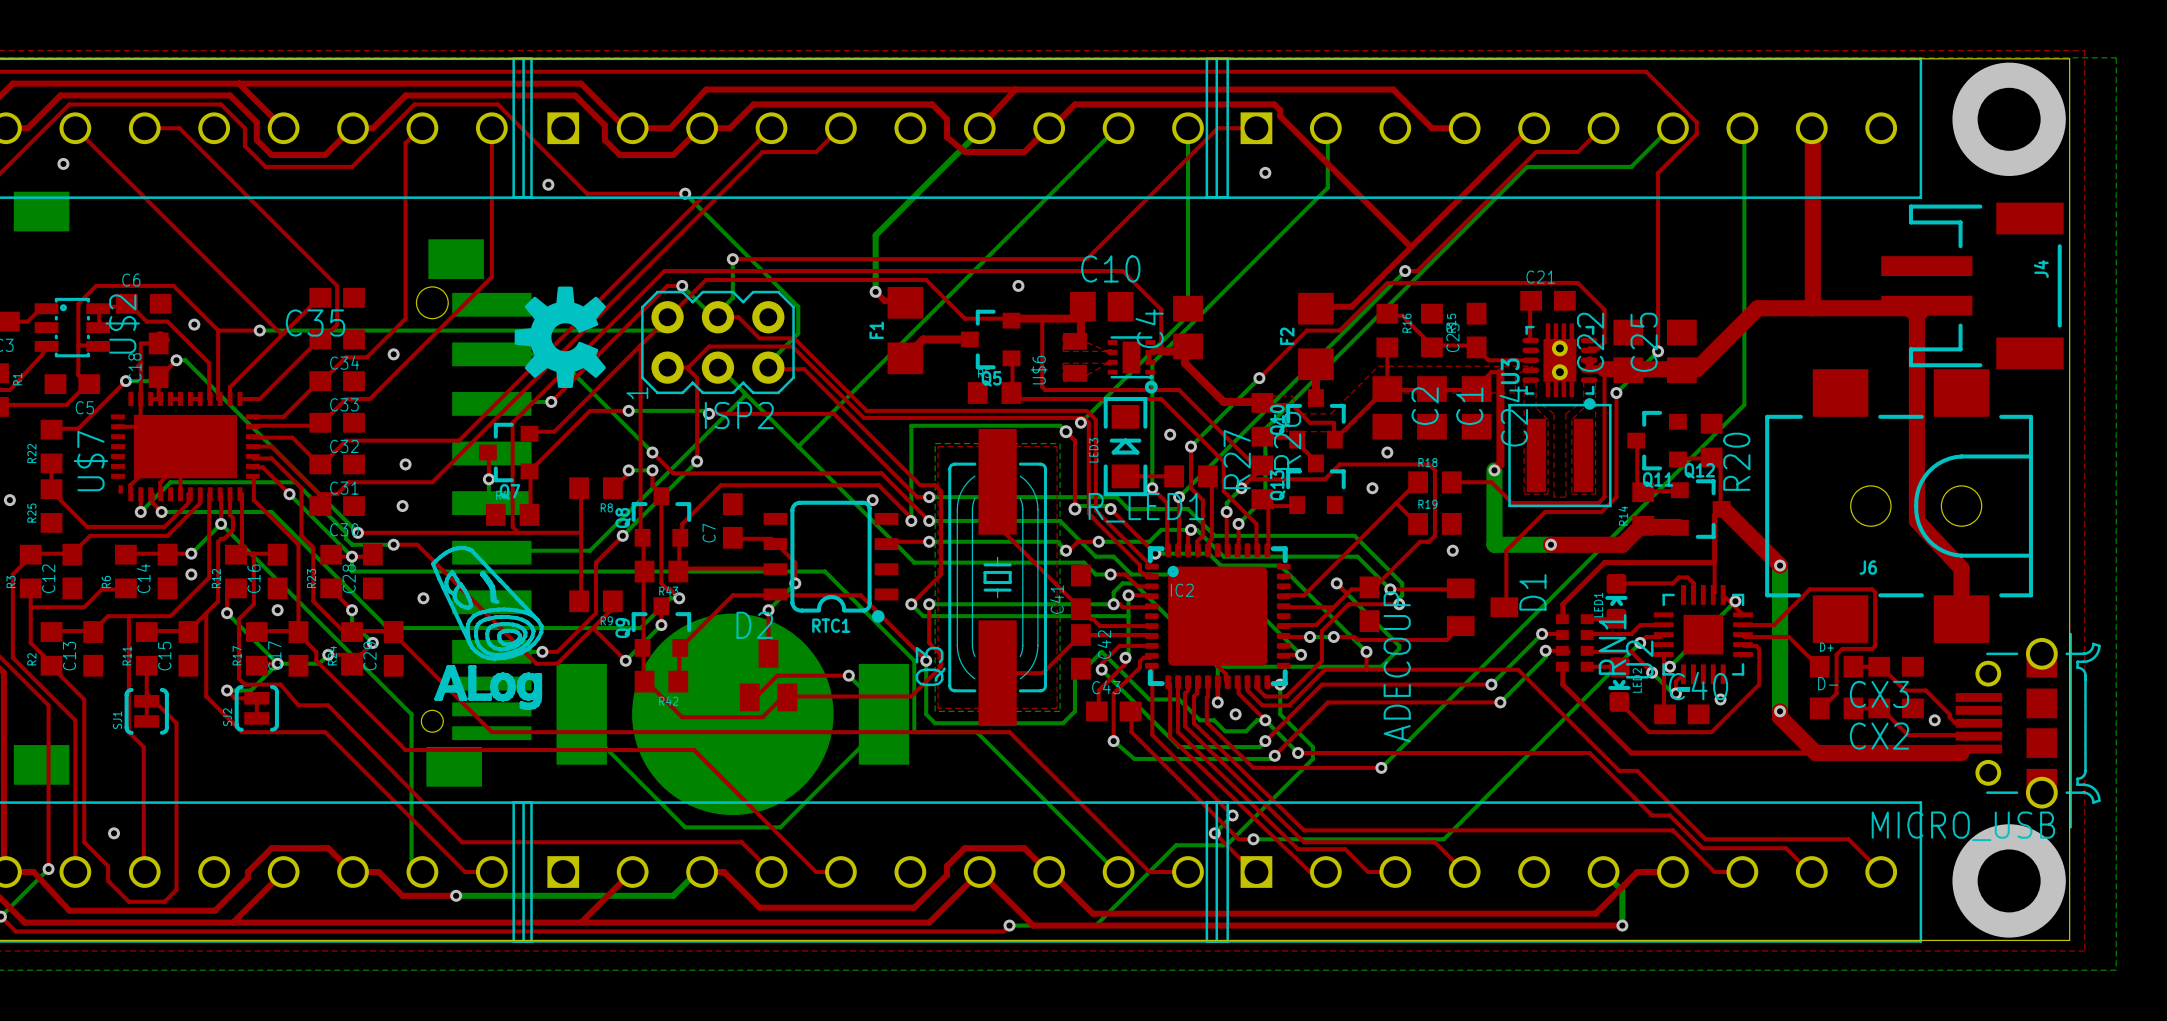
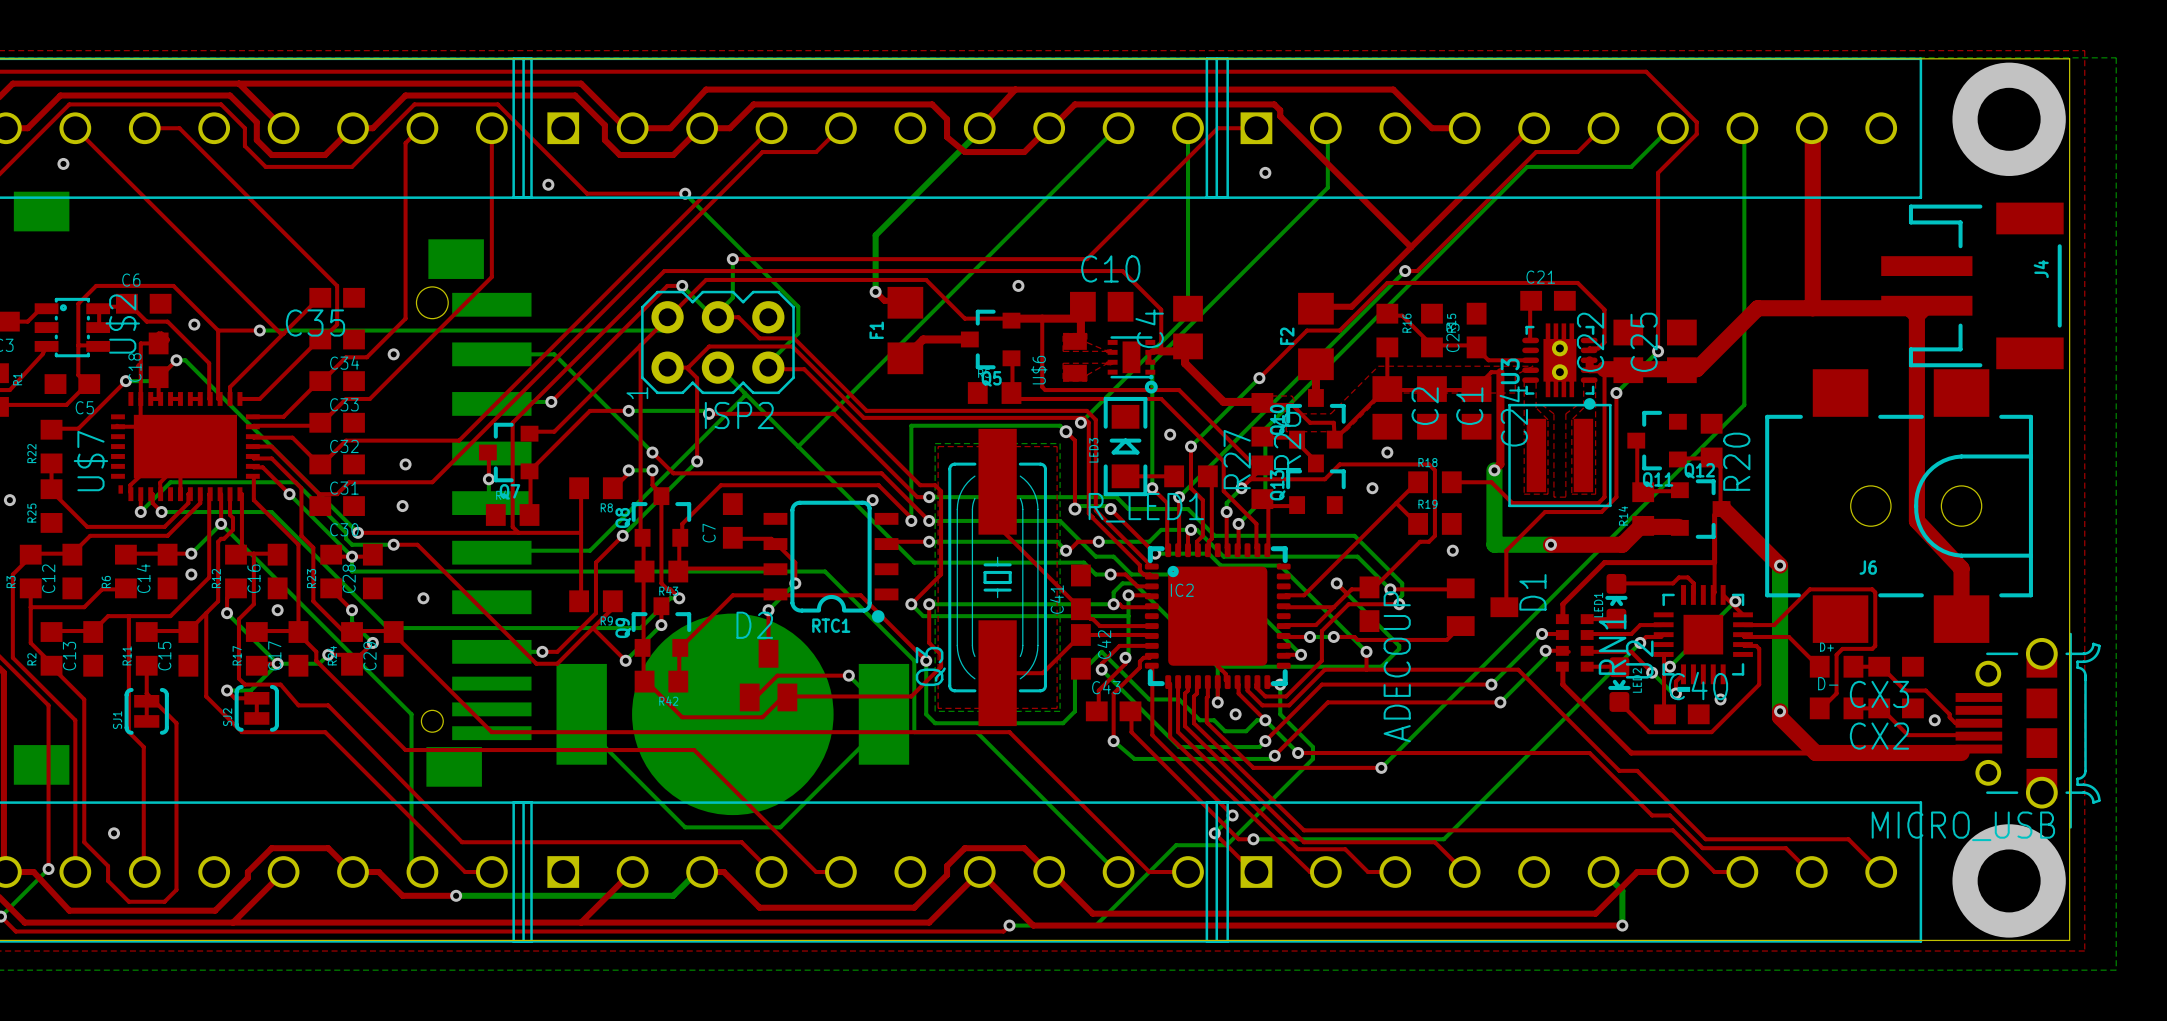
drawing: [514, 286, 606, 388] -> none
drawing: [431, 545, 544, 711] -> none

